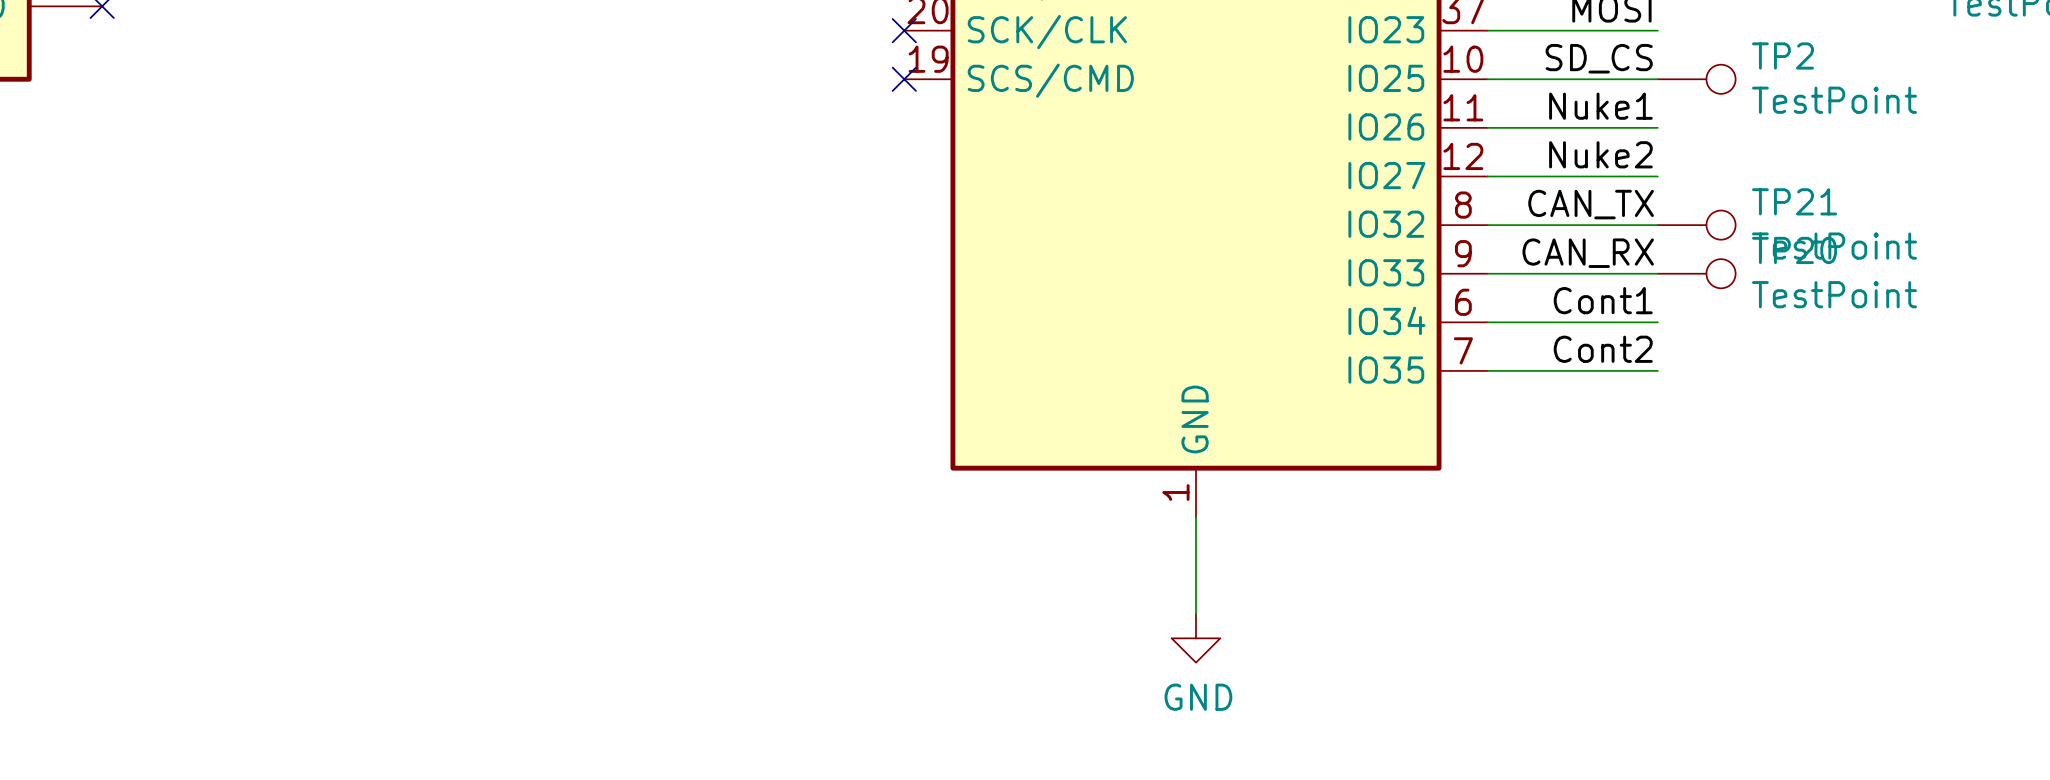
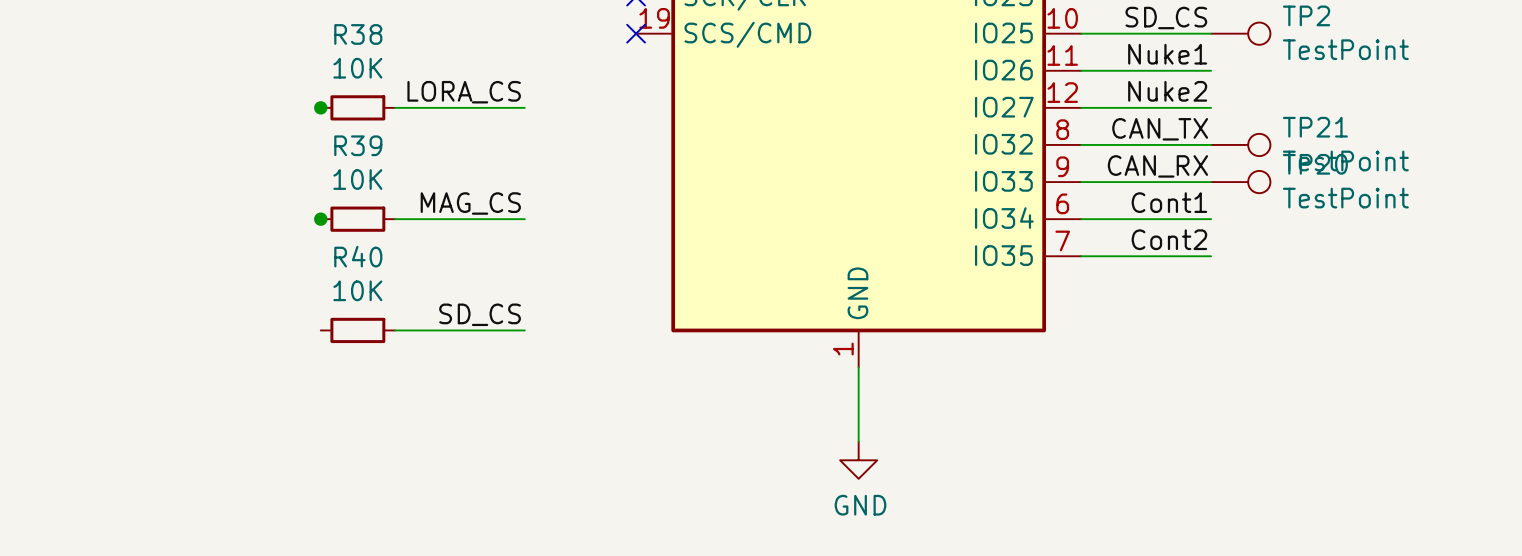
label: none -> LORA_CS (464, 92)
junction: none -> (320, 107)
R38: none -> 10K (357, 107)
wire: none -> (394, 107) (524, 107)
label: none -> MAG_CS (470, 203)
junction: none -> (320, 219)
R39: none -> 10K (357, 219)
wire: none -> (394, 219) (524, 219)
label: none -> SD_CS (480, 314)
R40: none -> 10K (357, 330)
wire: none -> (394, 330) (524, 330)

